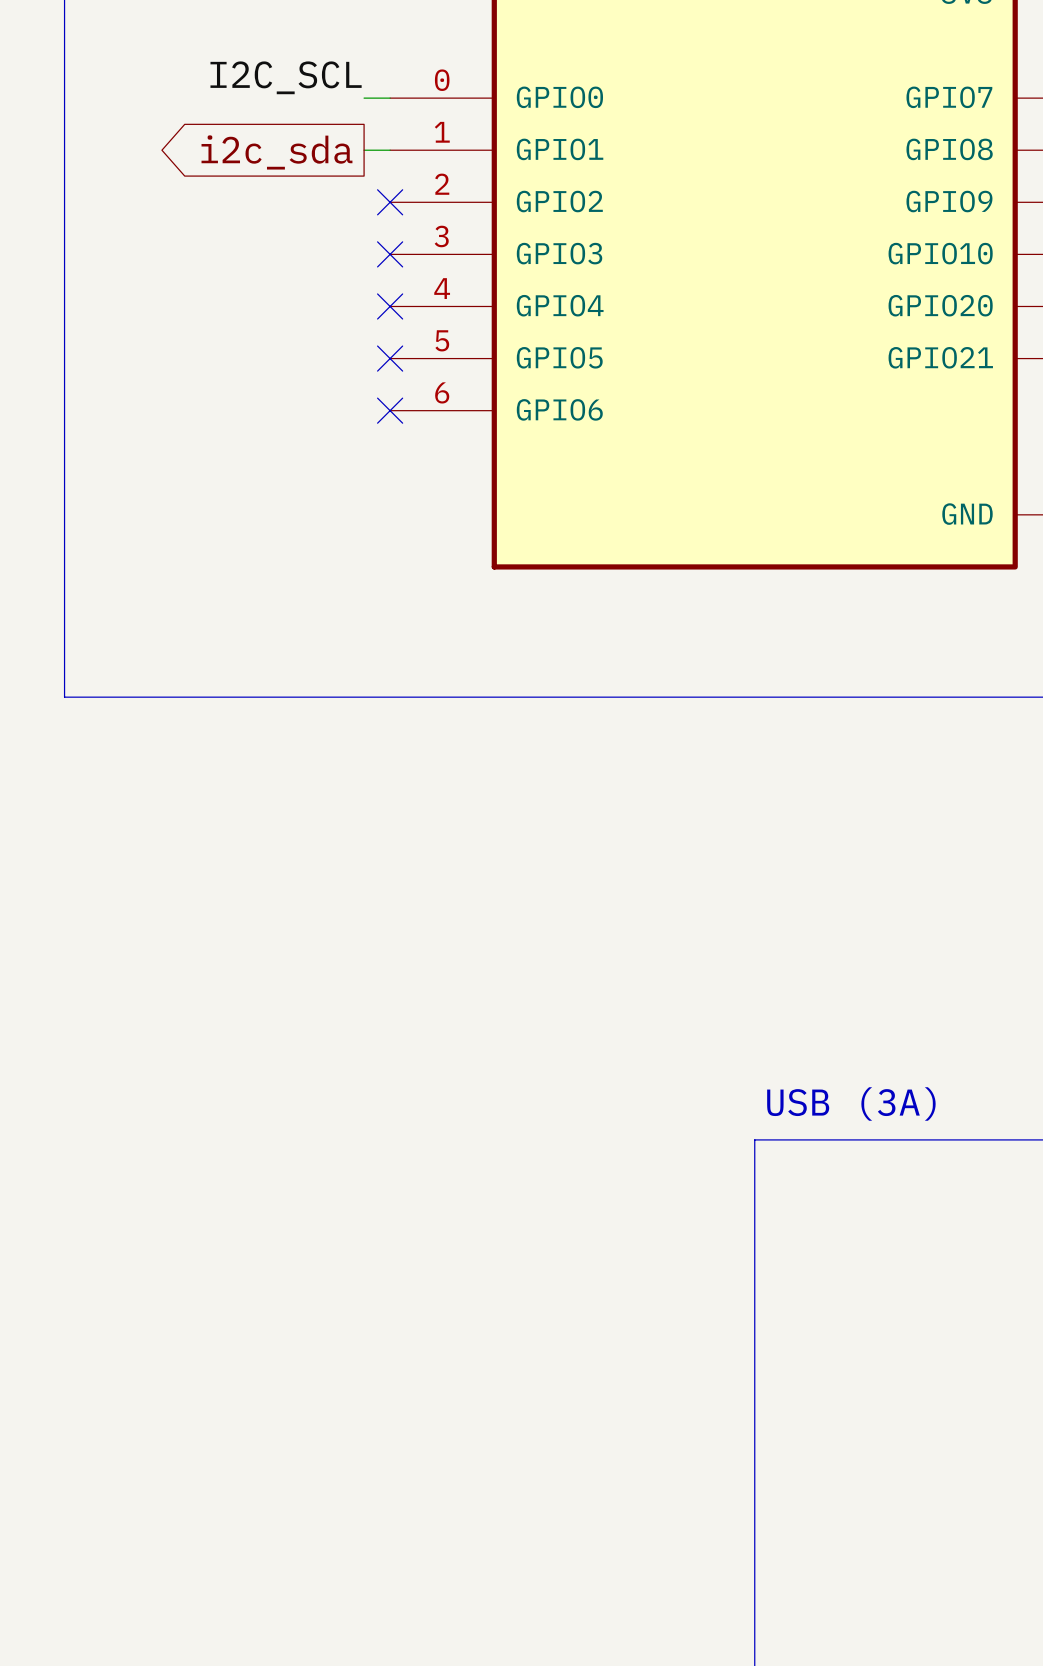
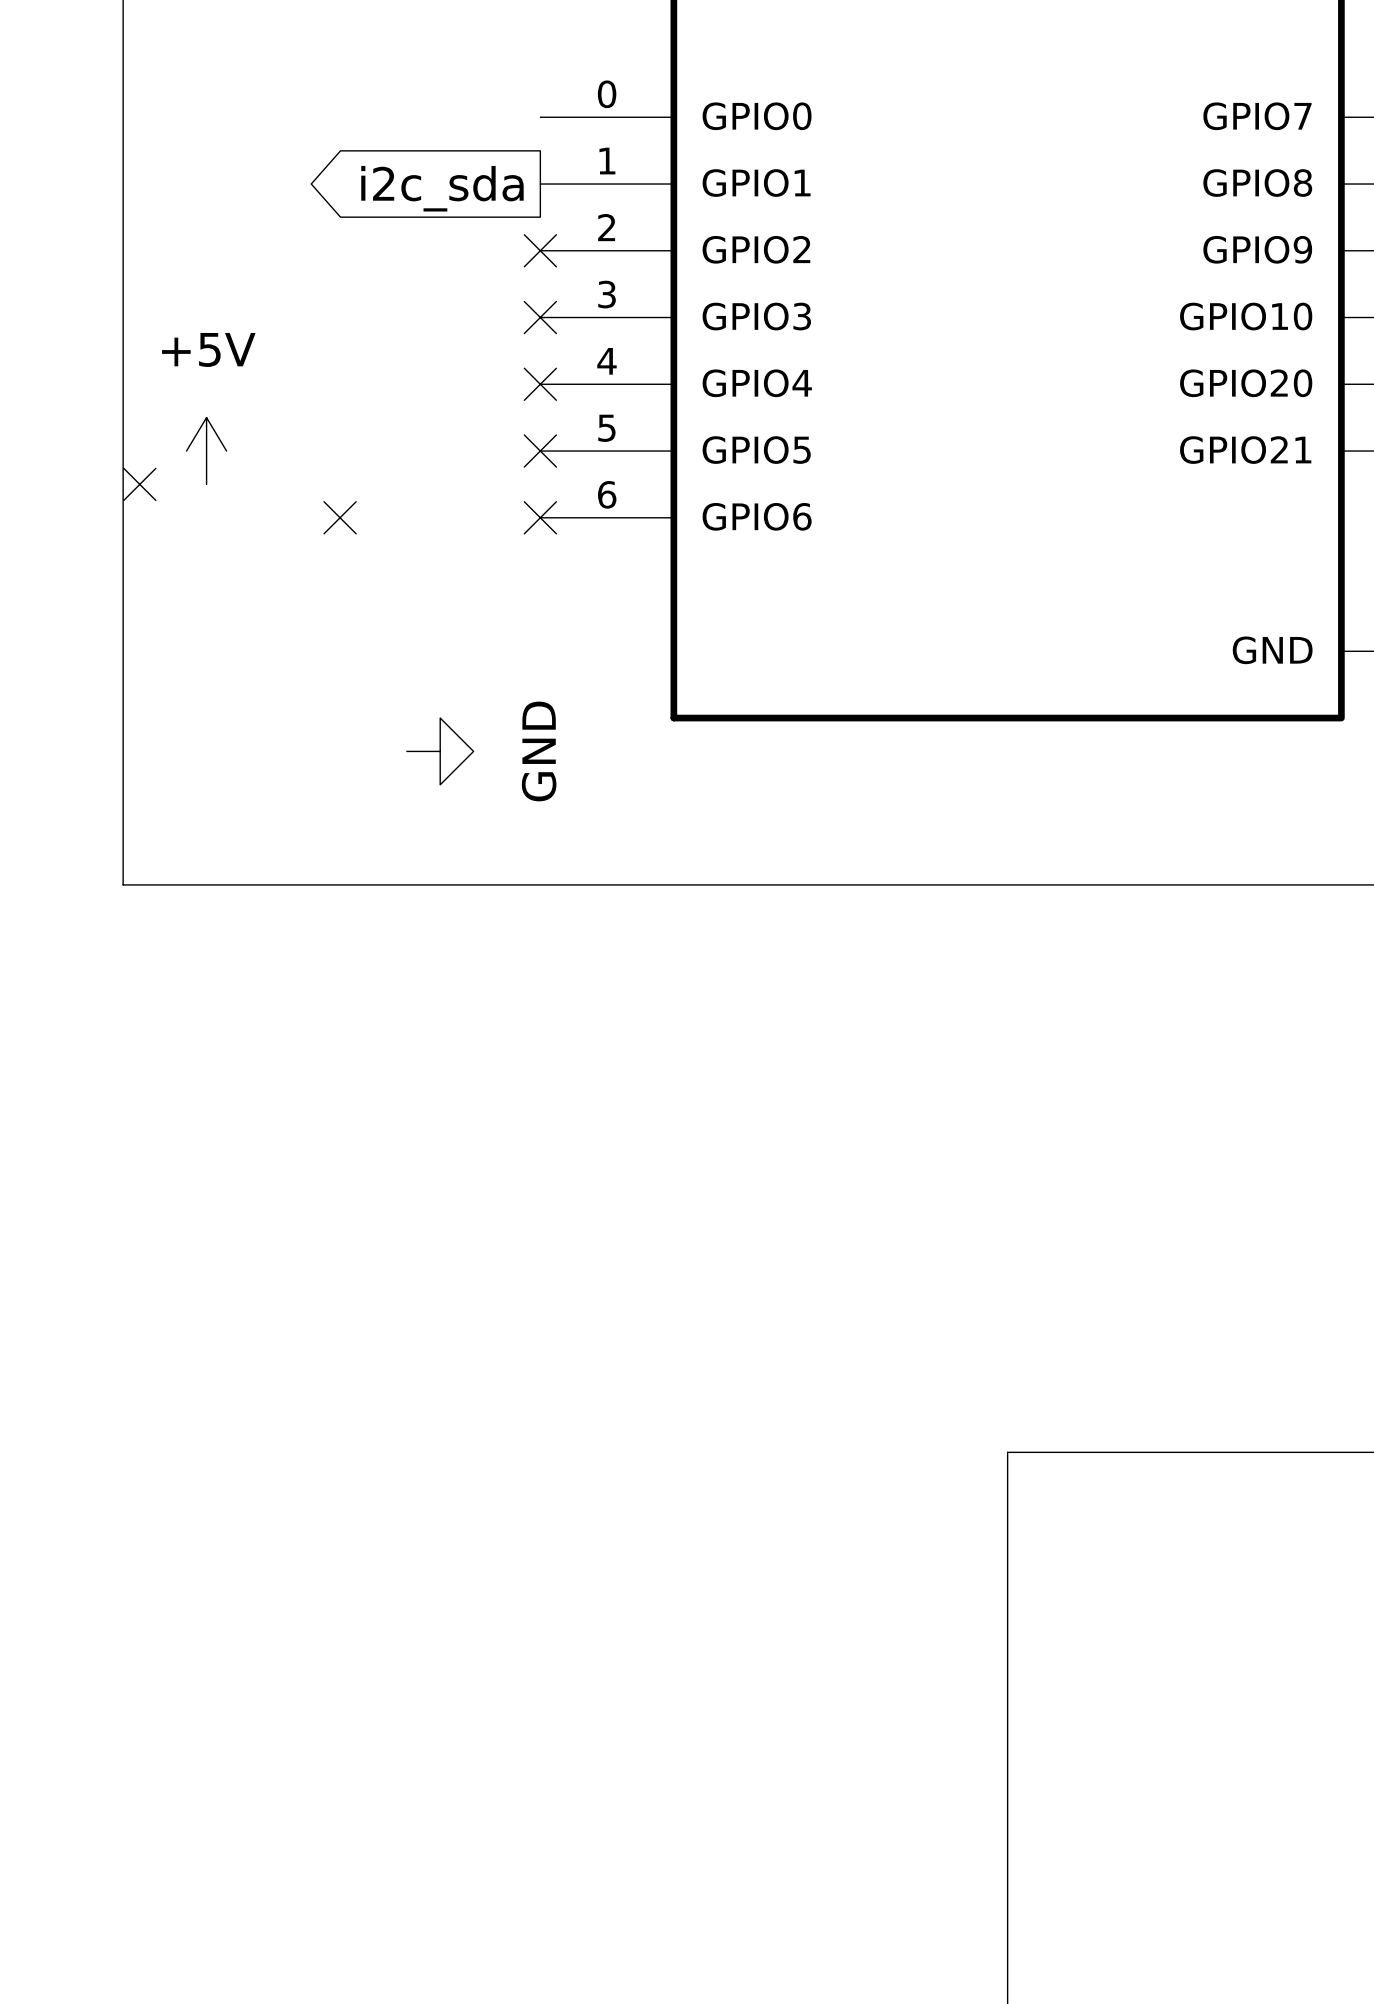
label: I2C_SCL (286, 77) -> none
wire: (364, 98) (390, 98) -> none
wire: (364, 150) (390, 150) -> none
global label position: i2c_sda (276, 152) -> i2c_sda (442, 188)
power symbol: none -> +5V (206, 451)
no-connect mark: none -> (139, 484)
no-connect mark: none -> (340, 517)
power symbol: none -> GND (440, 751)
text: USB (3A) (851, 1103) -> none

